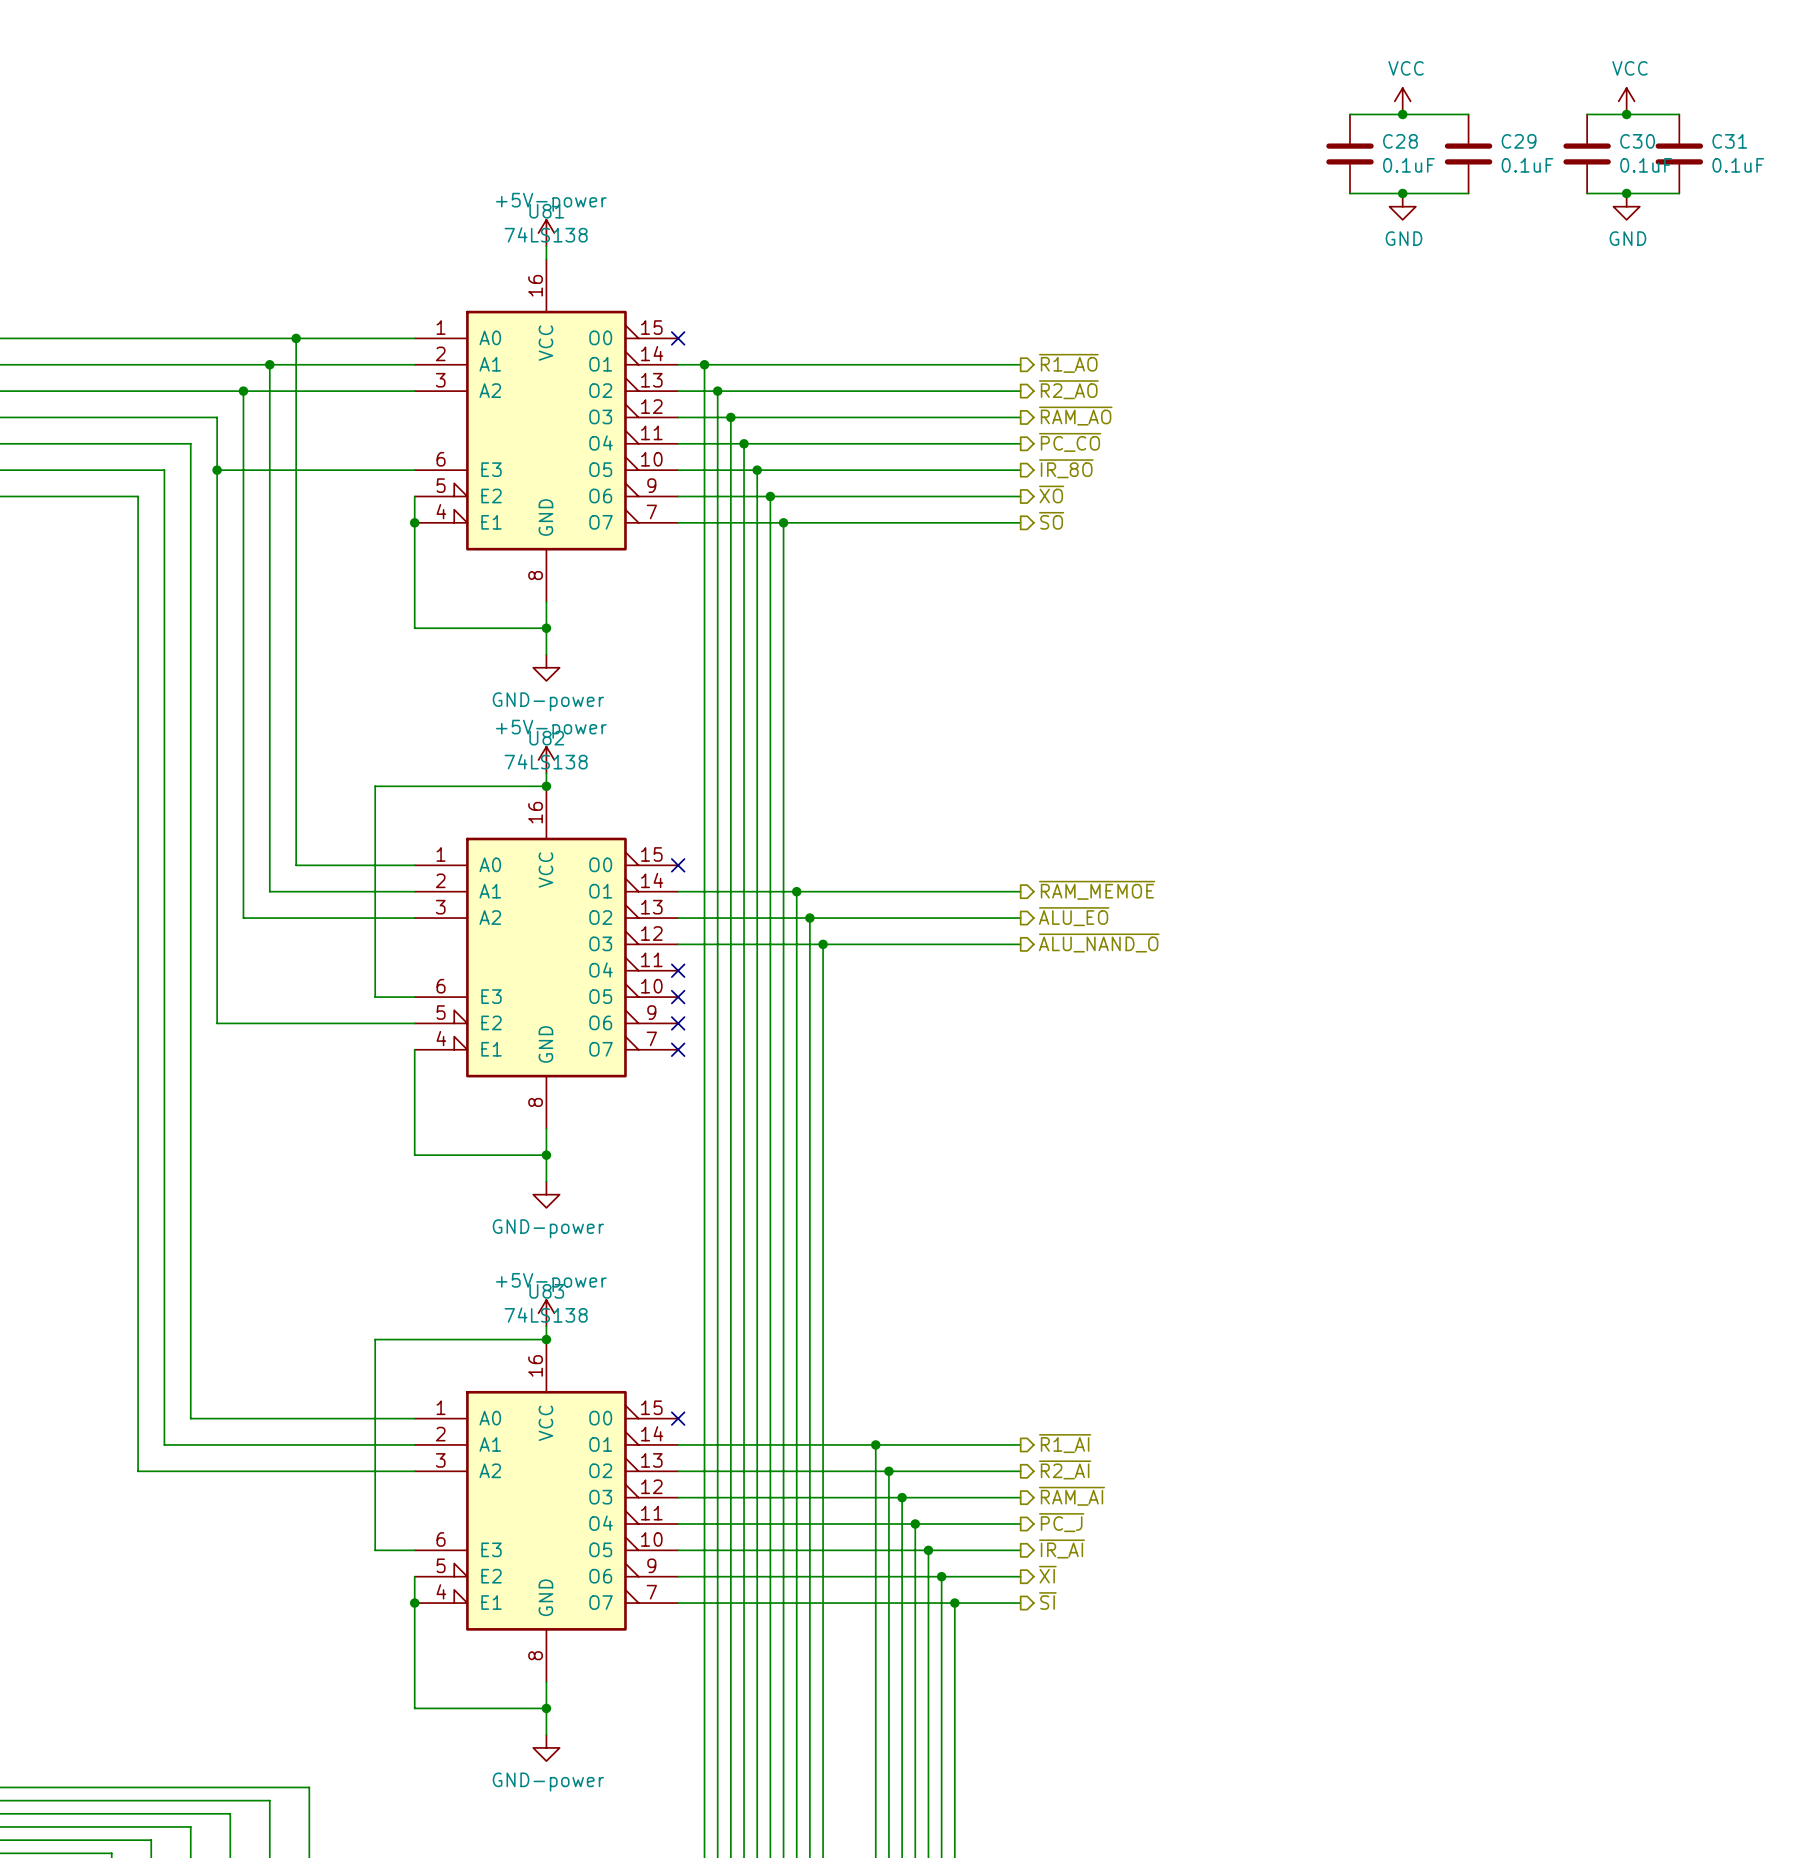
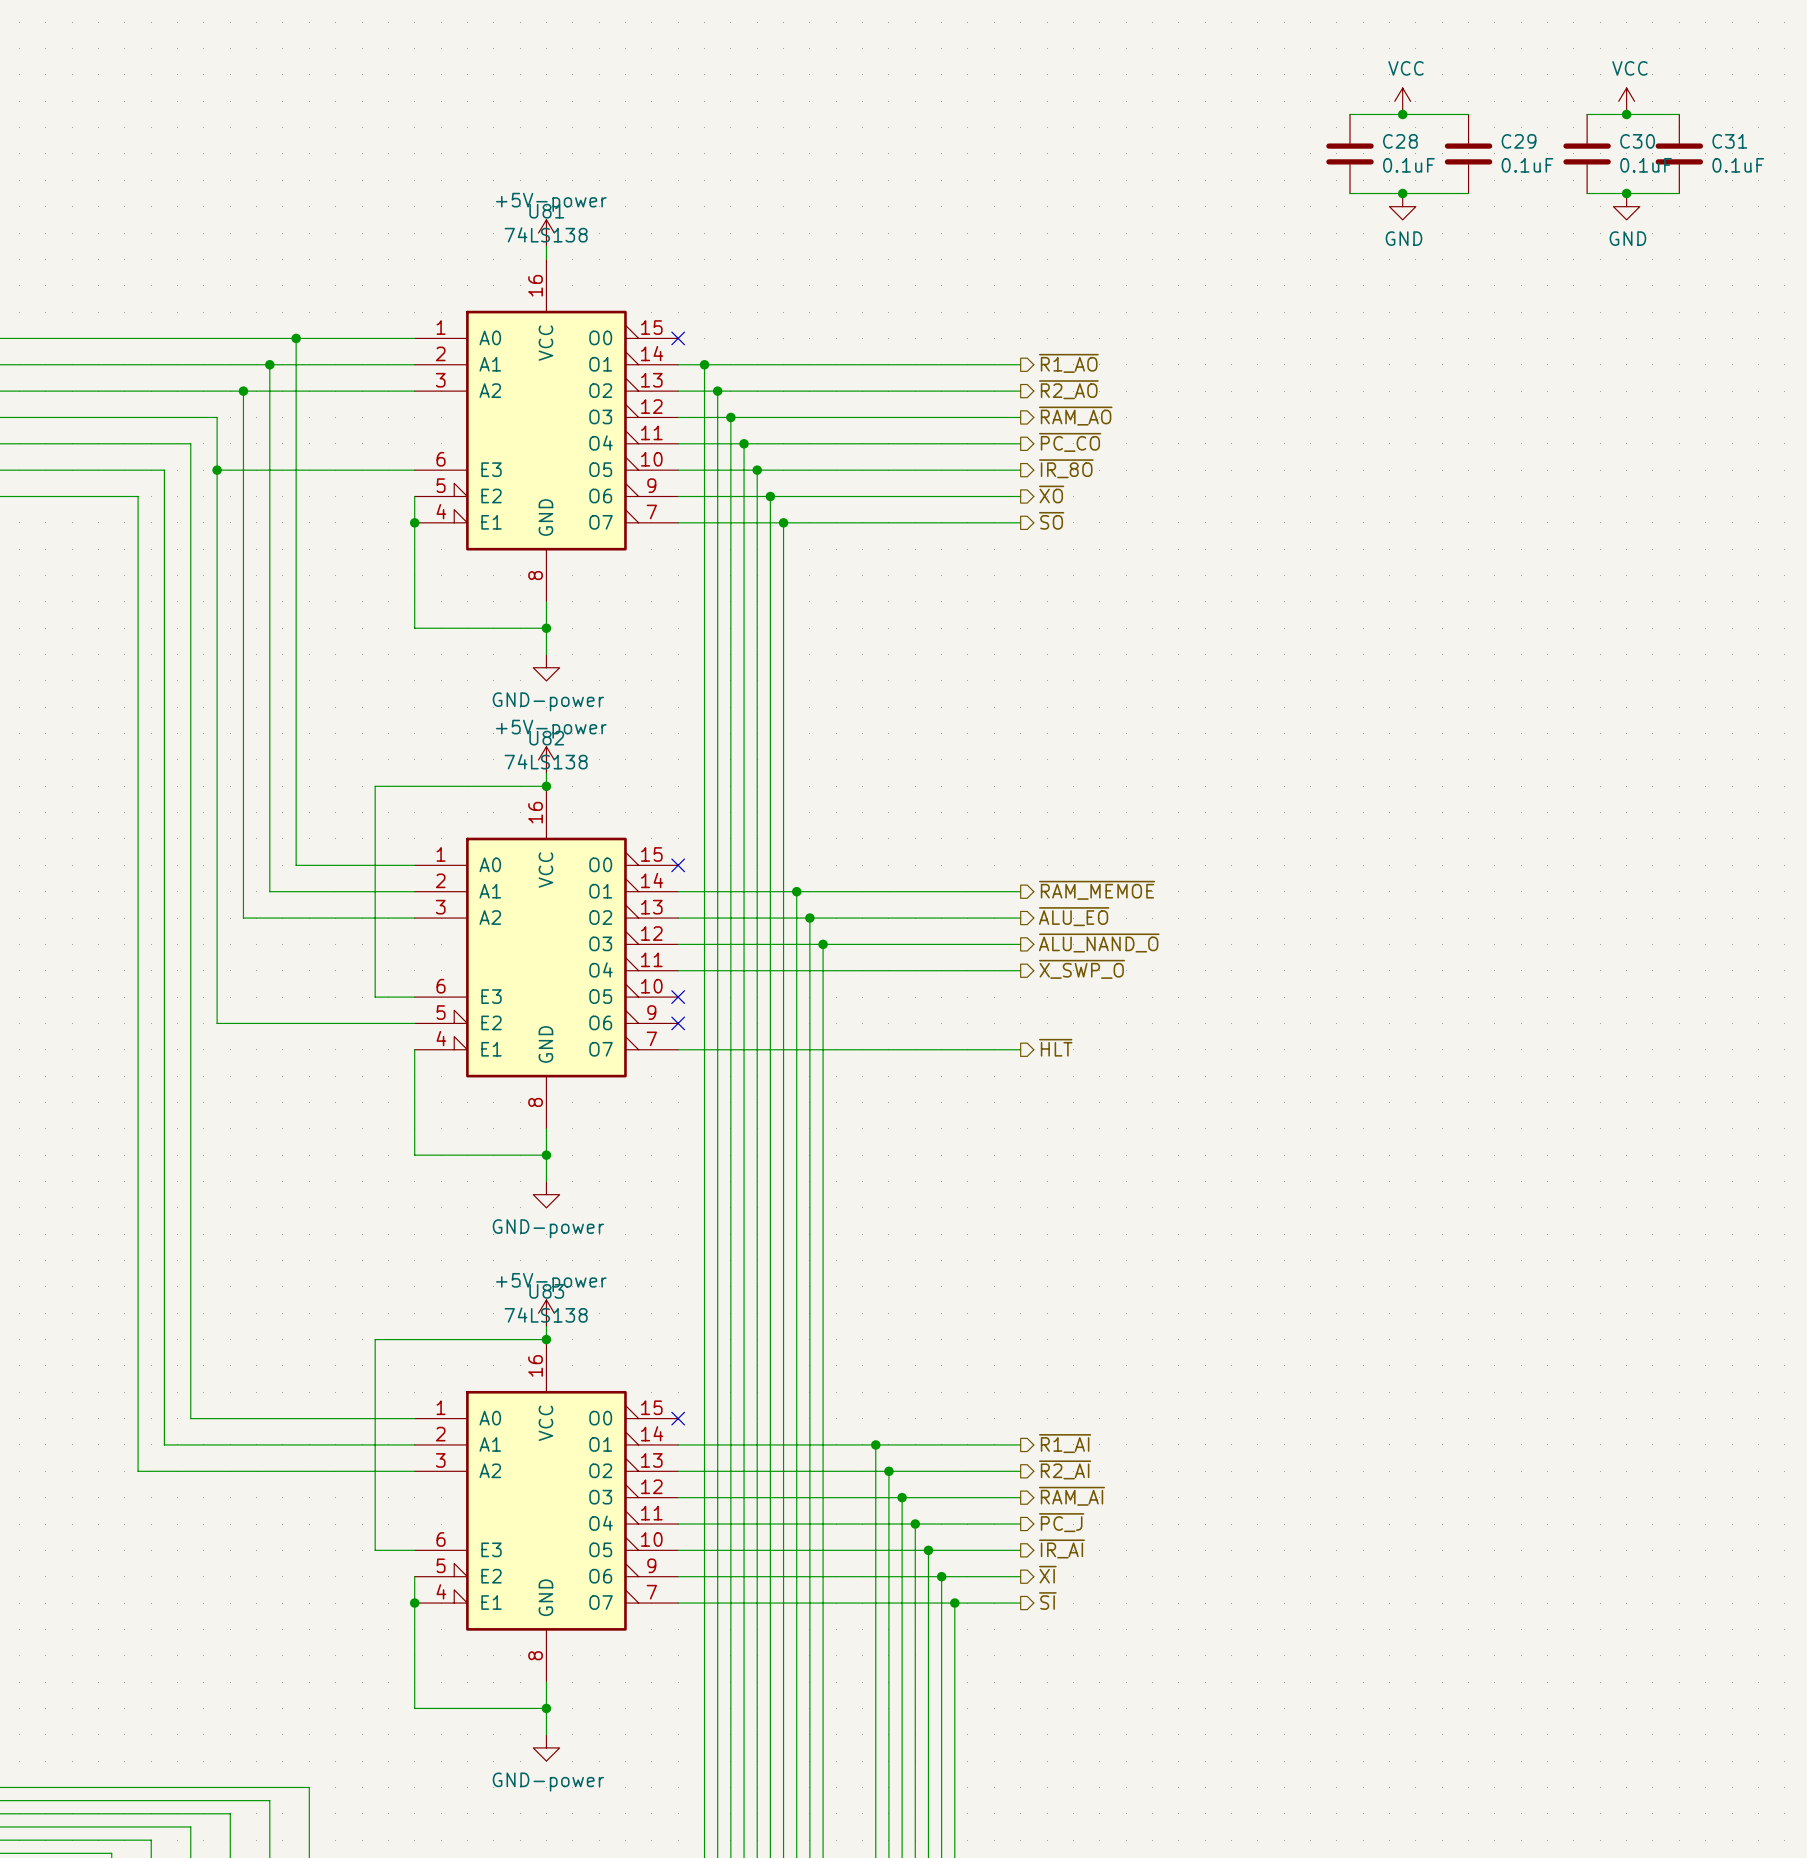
hierarchical label: none -> ~{X_SWP_O} (1082, 969)
wire: none -> (678, 970) (1020, 970)
no-connect mark: (678, 970) -> none
hierarchical label: none -> ~{HLT} (1055, 1047)
wire: none -> (678, 1049) (1020, 1049)
no-connect mark: (678, 1049) -> none

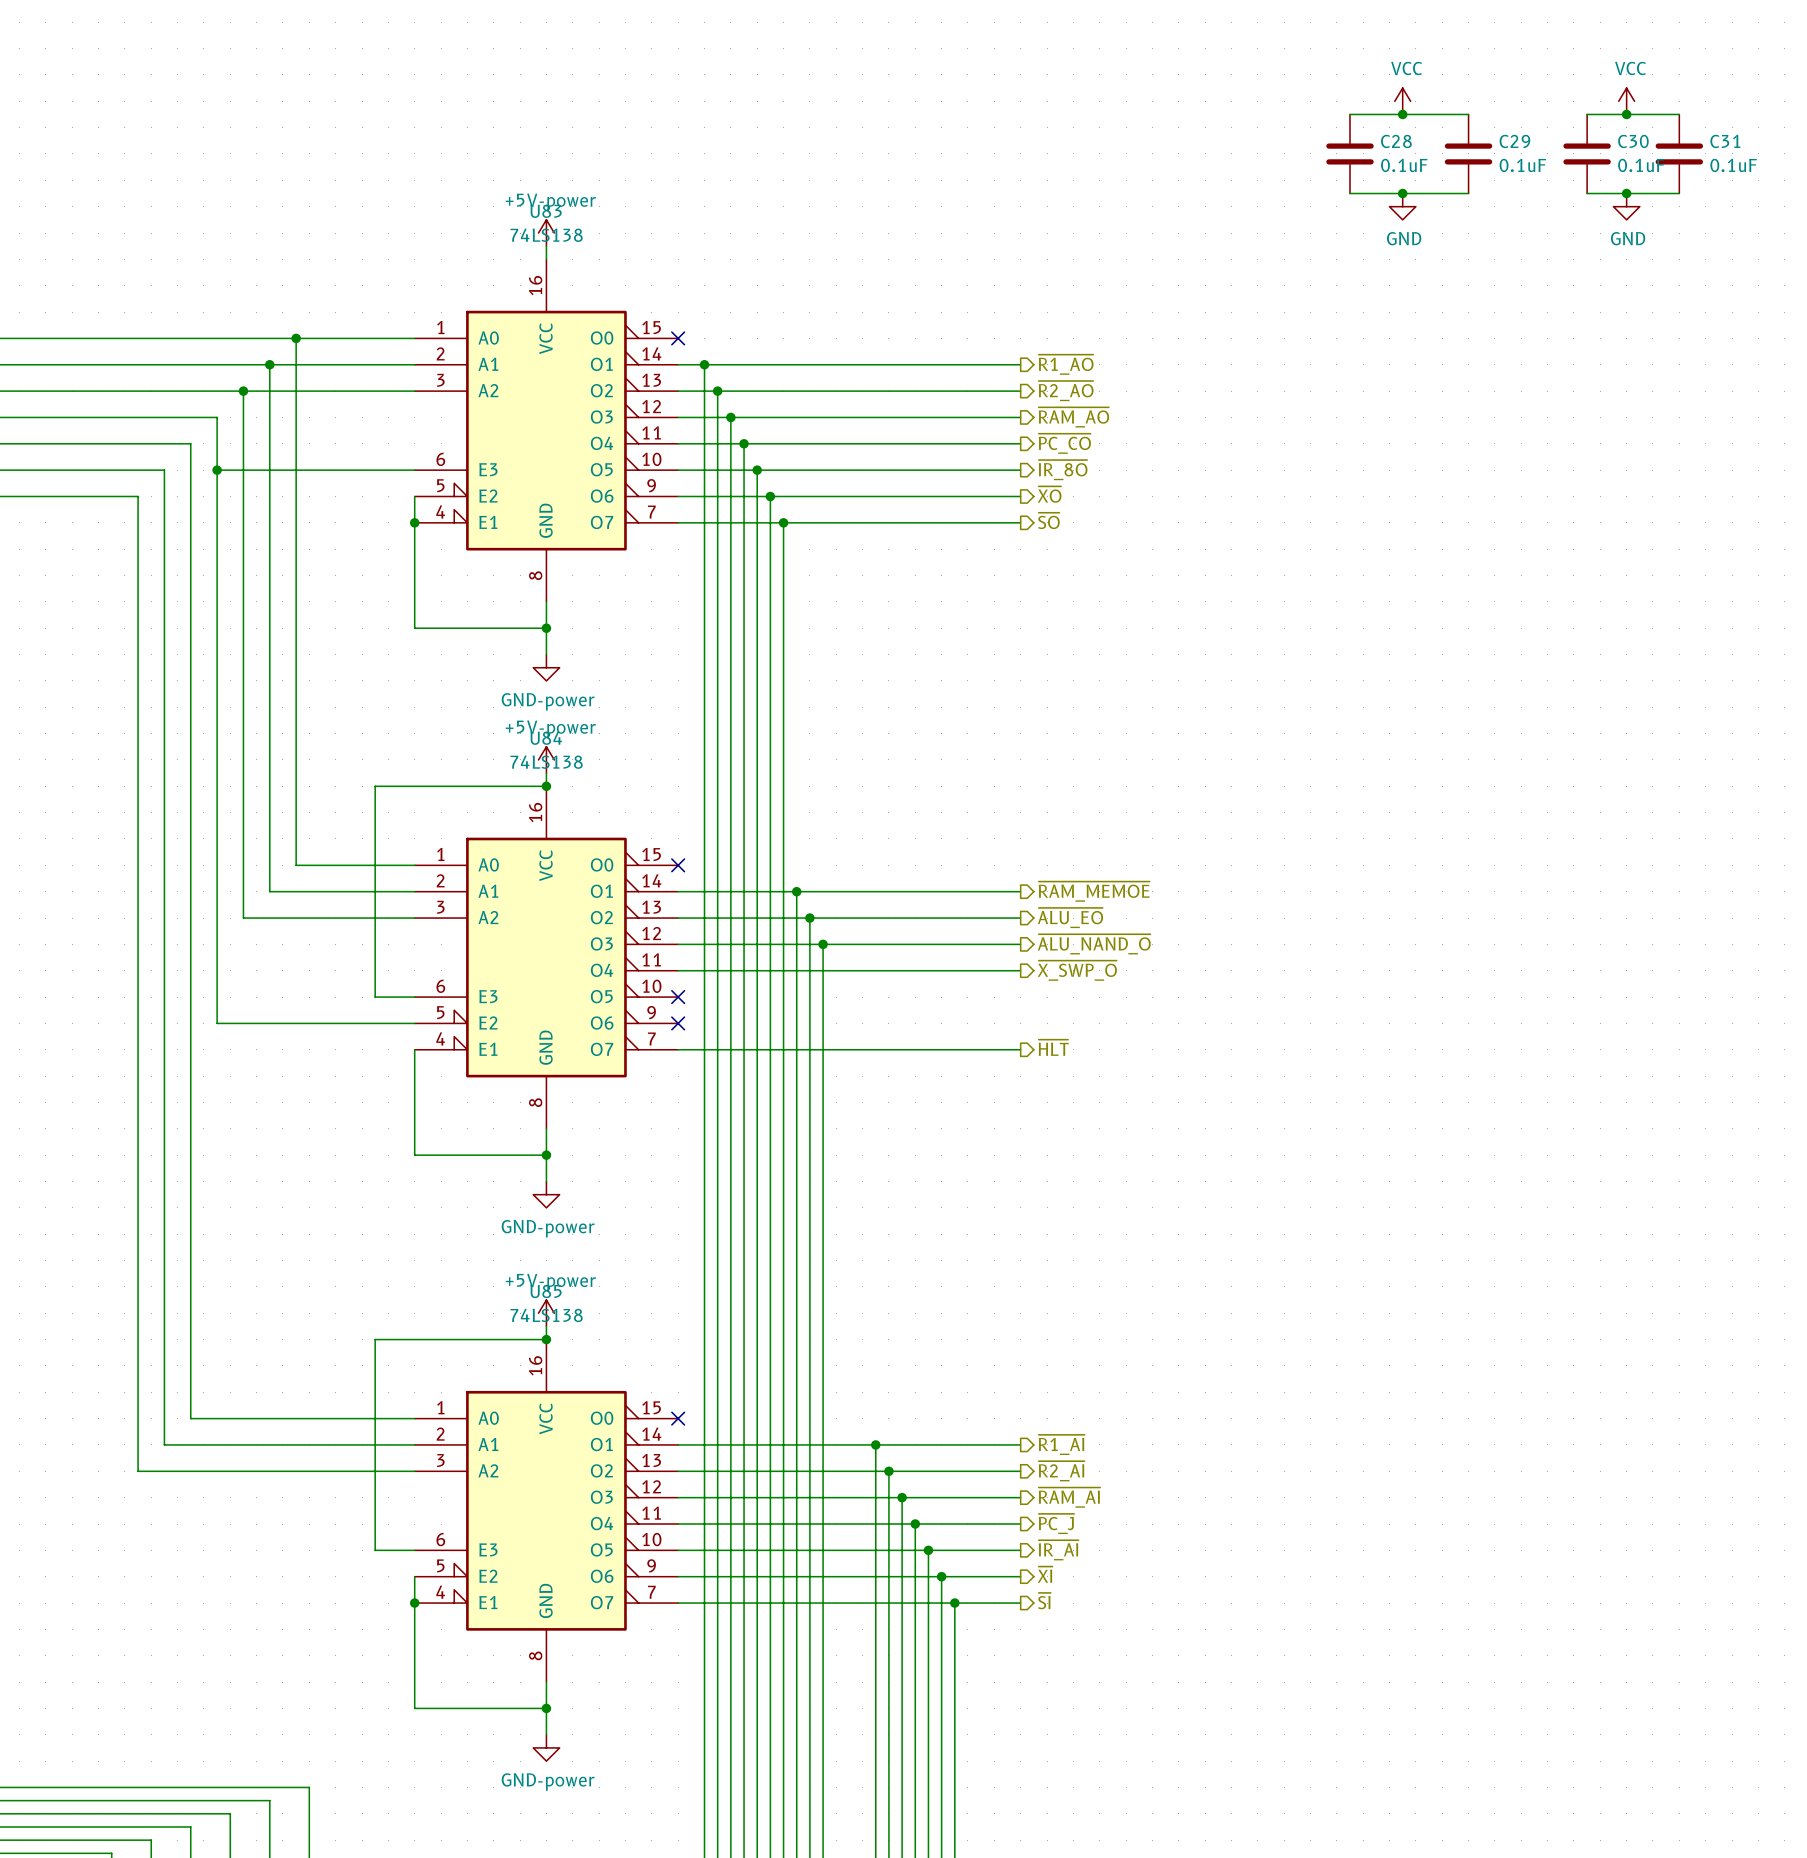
U81 name: U81 (546, 211) -> U83 (546, 211)
U82 name: U82 (546, 738) -> U84 (546, 738)
U83 name: U83 (546, 1291) -> U85 (546, 1291)

